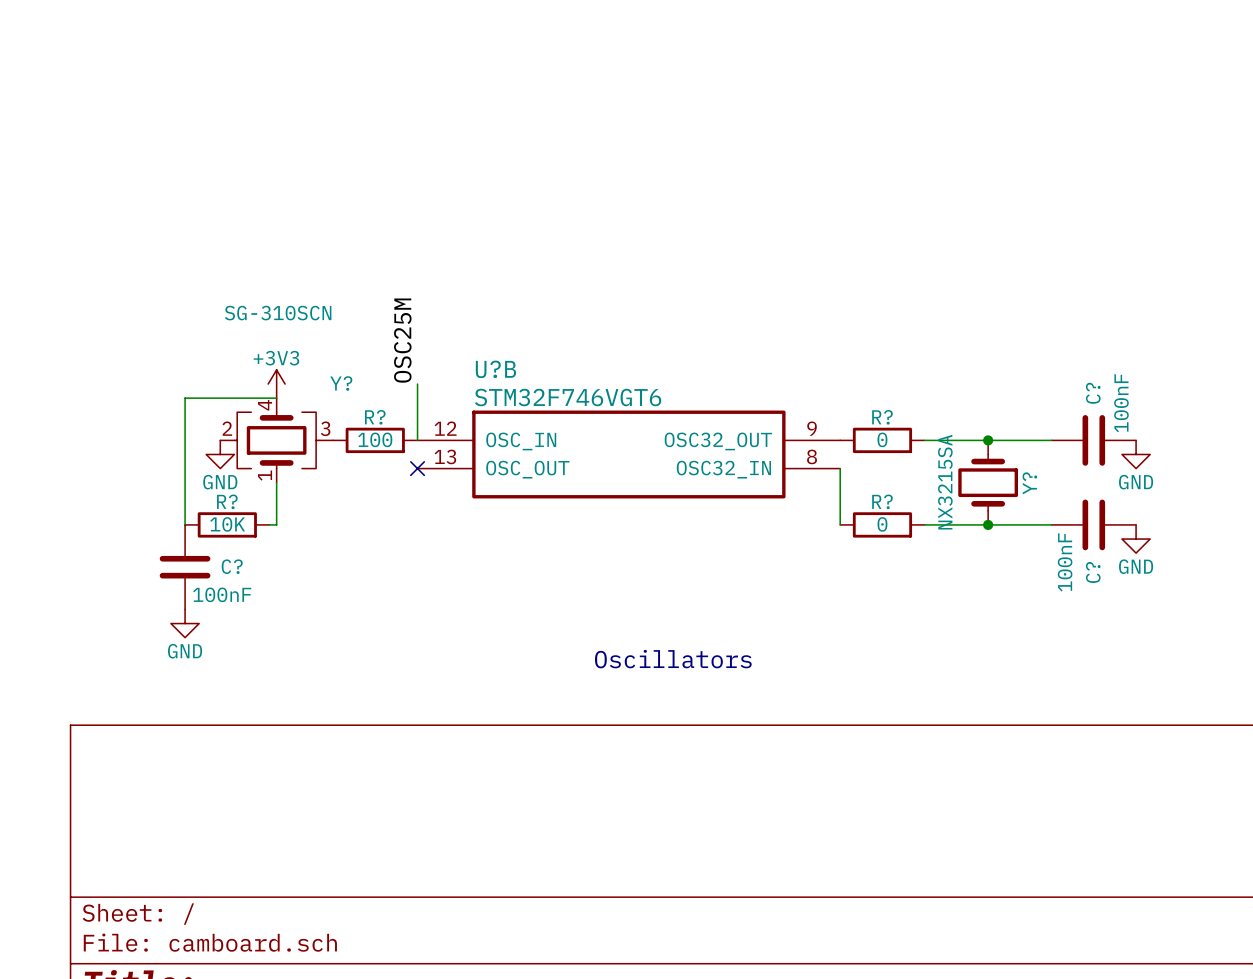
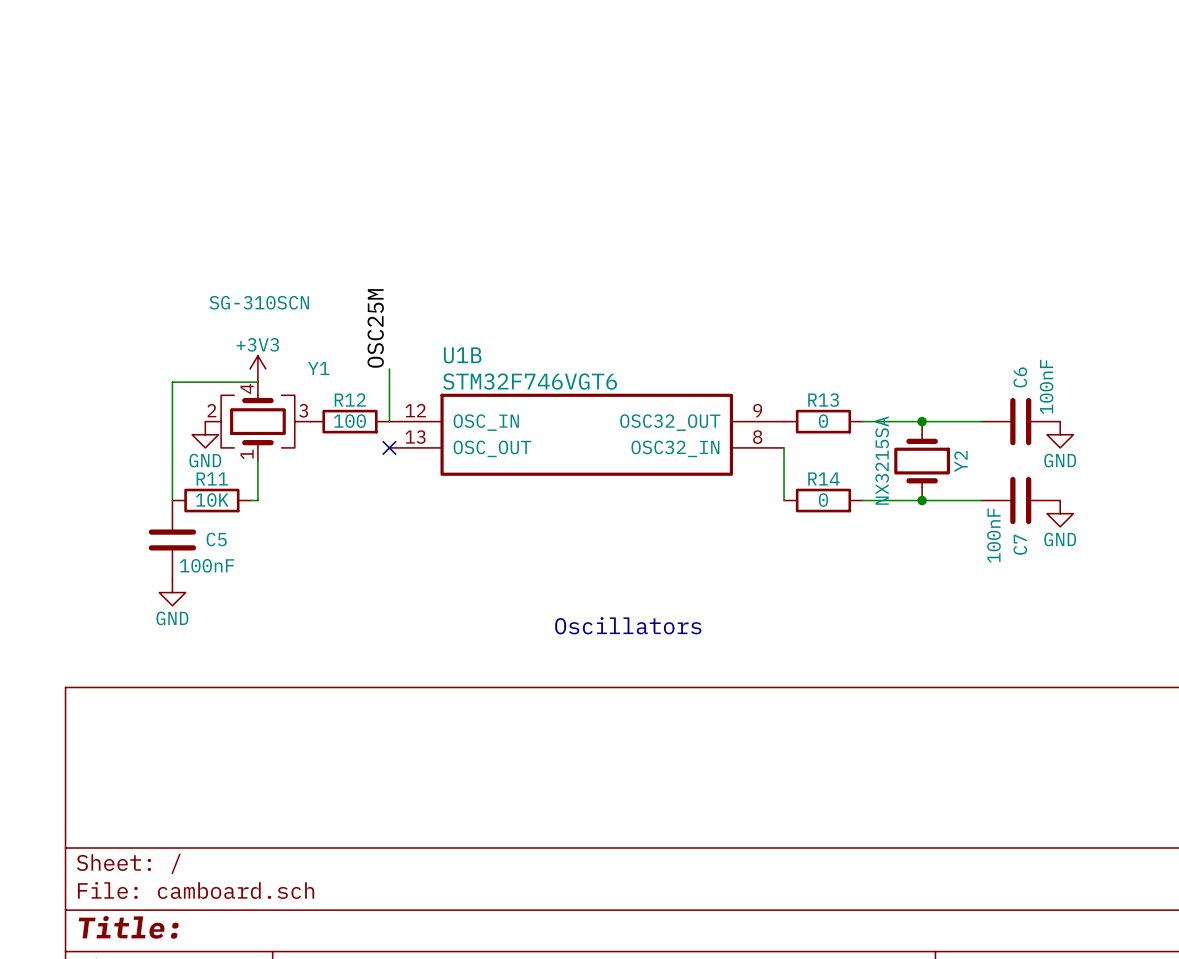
U?B name: U?B (495, 369) -> U1B (462, 355)
Y? name: Y? (341, 383) -> Y1 (318, 368)
C? name: C? (1093, 393) -> C6 (1020, 377)
R? name: R? (375, 417) -> R12 (350, 399)
R? name: R? (882, 417) -> R13 (823, 400)
Y? name: Y? (1029, 483) -> Y2 (960, 461)
R? name: R? (227, 501) -> R11 (212, 478)
R? name: R? (882, 501) -> R14 (823, 478)
C? name: C? (232, 566) -> C5 (216, 539)
C? name: C? (1093, 572) -> C7 (1020, 544)

